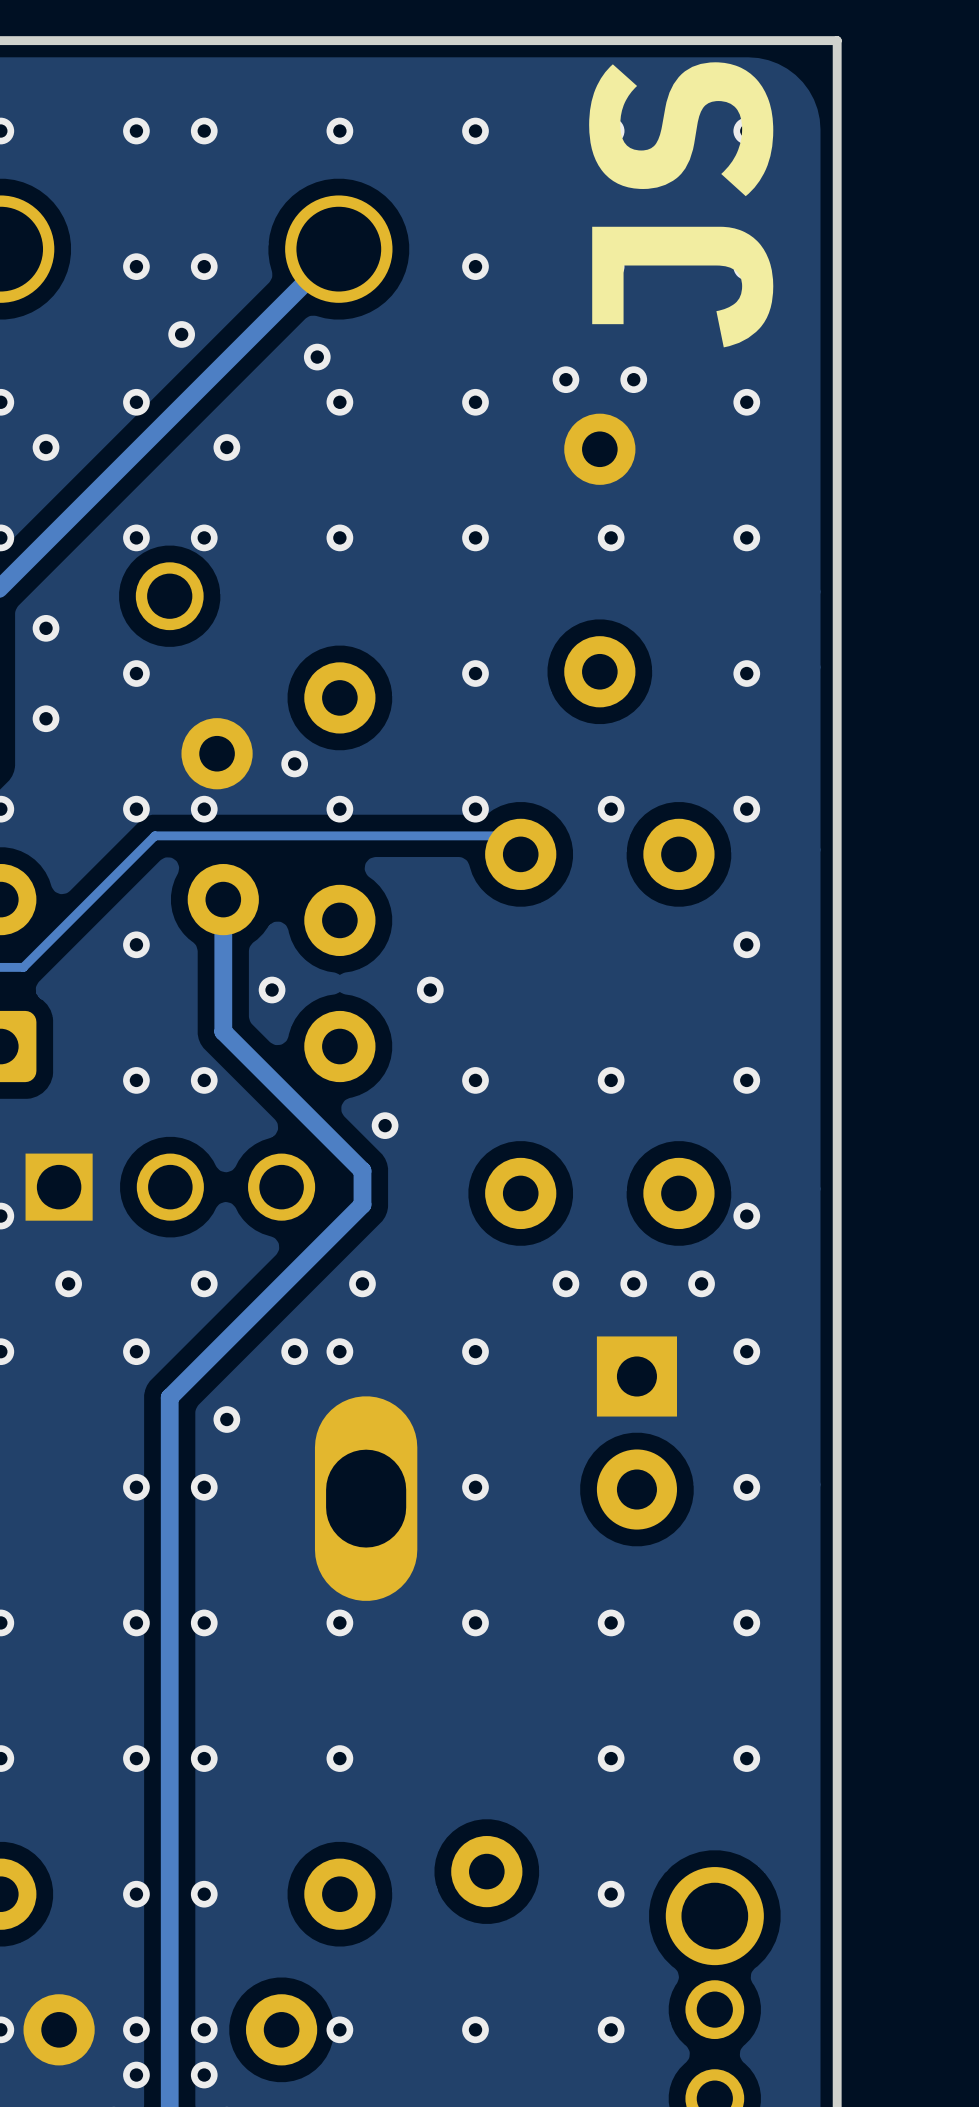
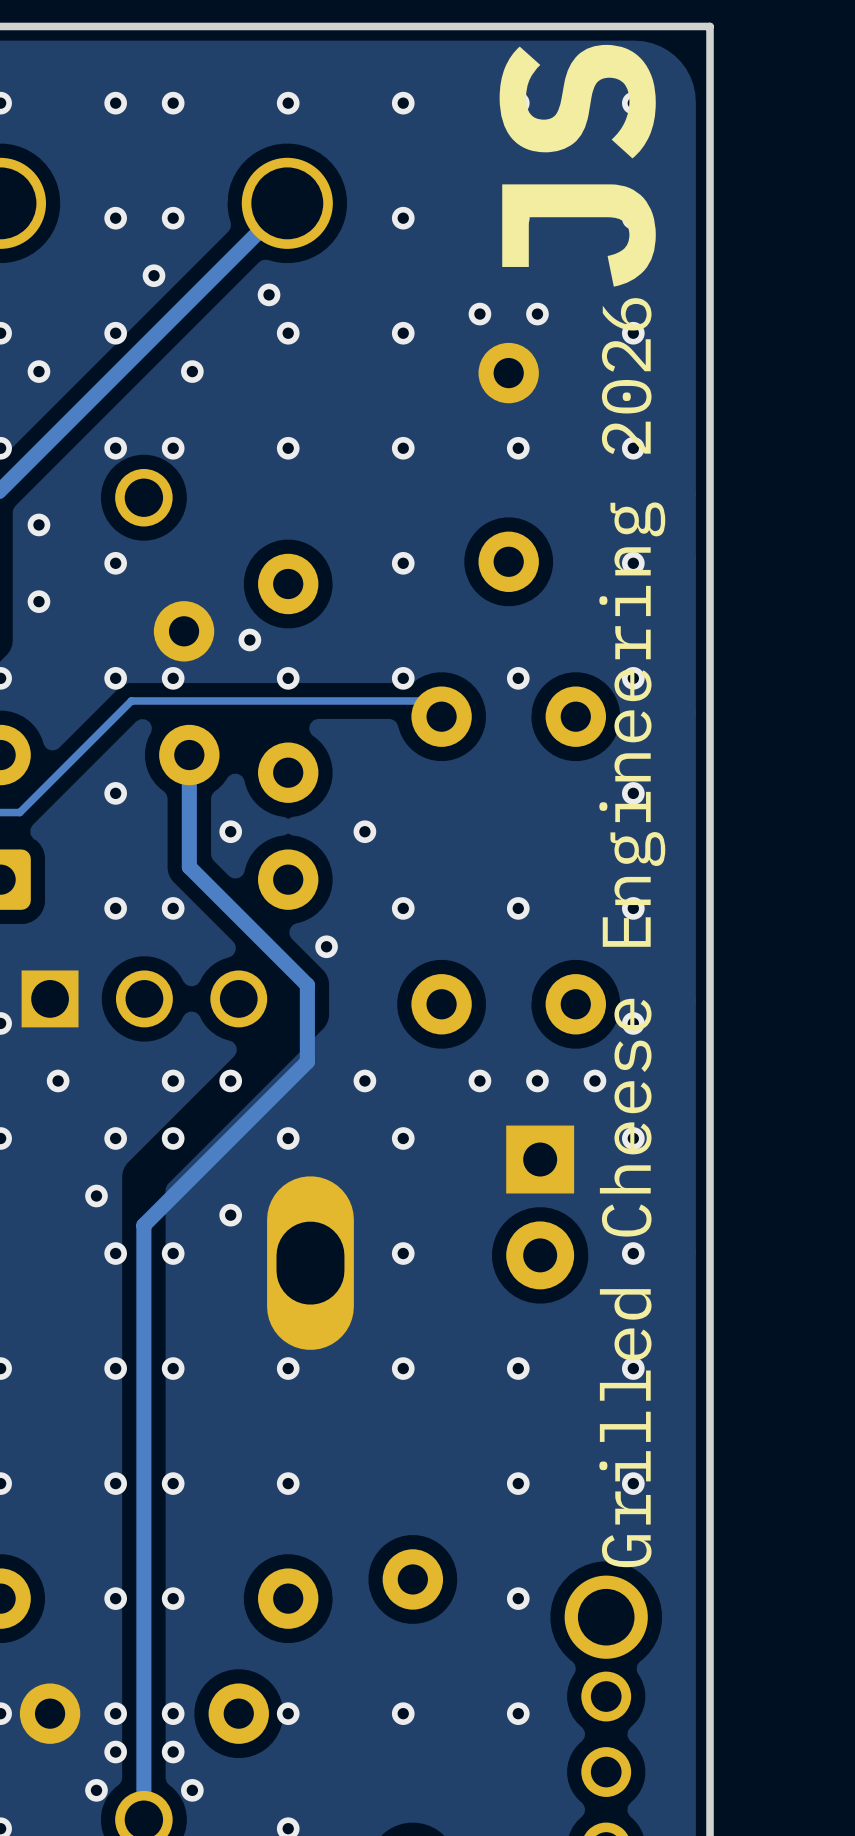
text: none -> Grilled Cheese Engineering 2026 (632, 932)
track: (362, 1204) (169, 1397) (169, 1454) -> (307, 1013) (307, 1061) (143, 1225)
via: none -> (230, 1080)
via: (362, 1283) -> none
via: none -> (364, 1080)
via: none -> (173, 1138)
via: (294, 1351) -> none
via: none -> (96, 1196)
via: (226, 1419) -> none
via: none -> (230, 1215)

